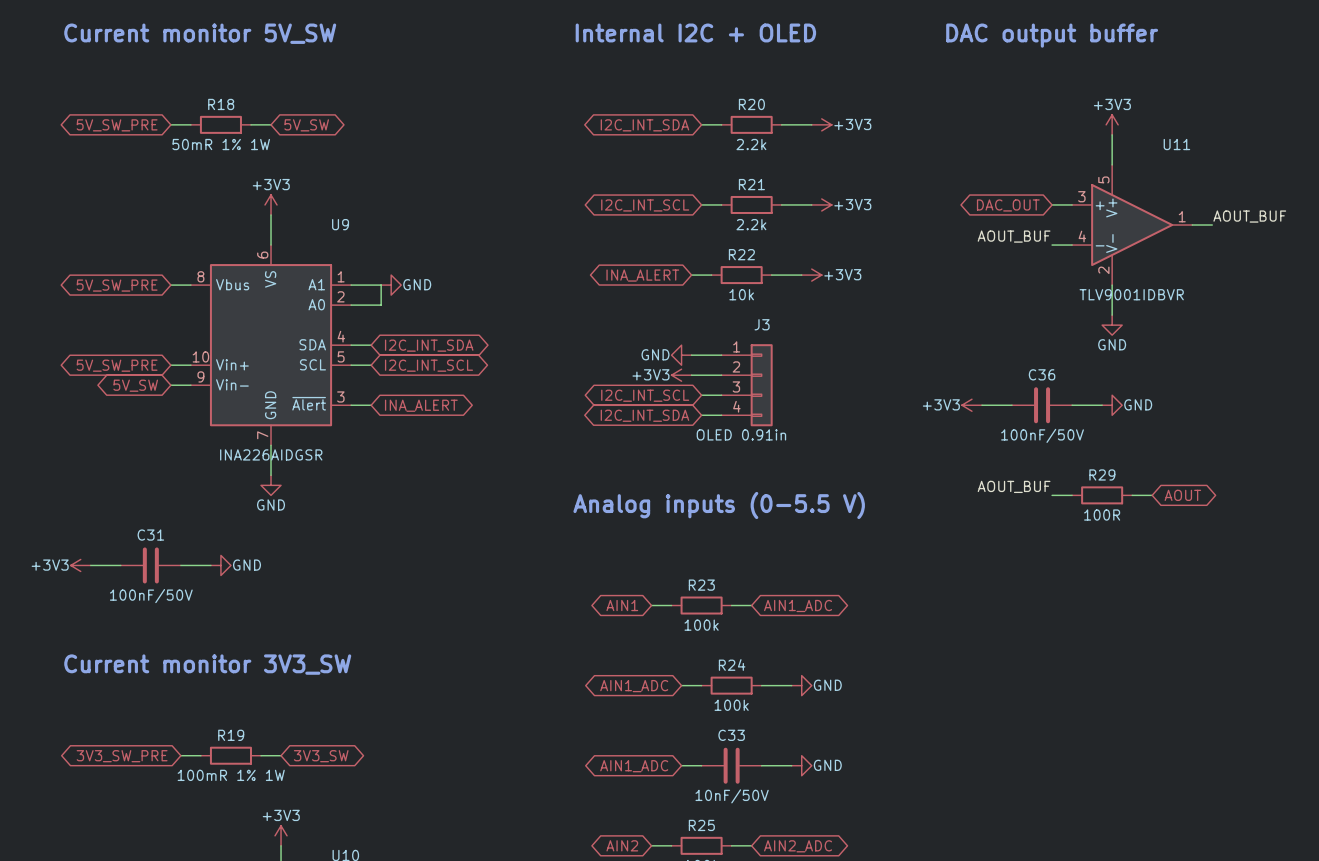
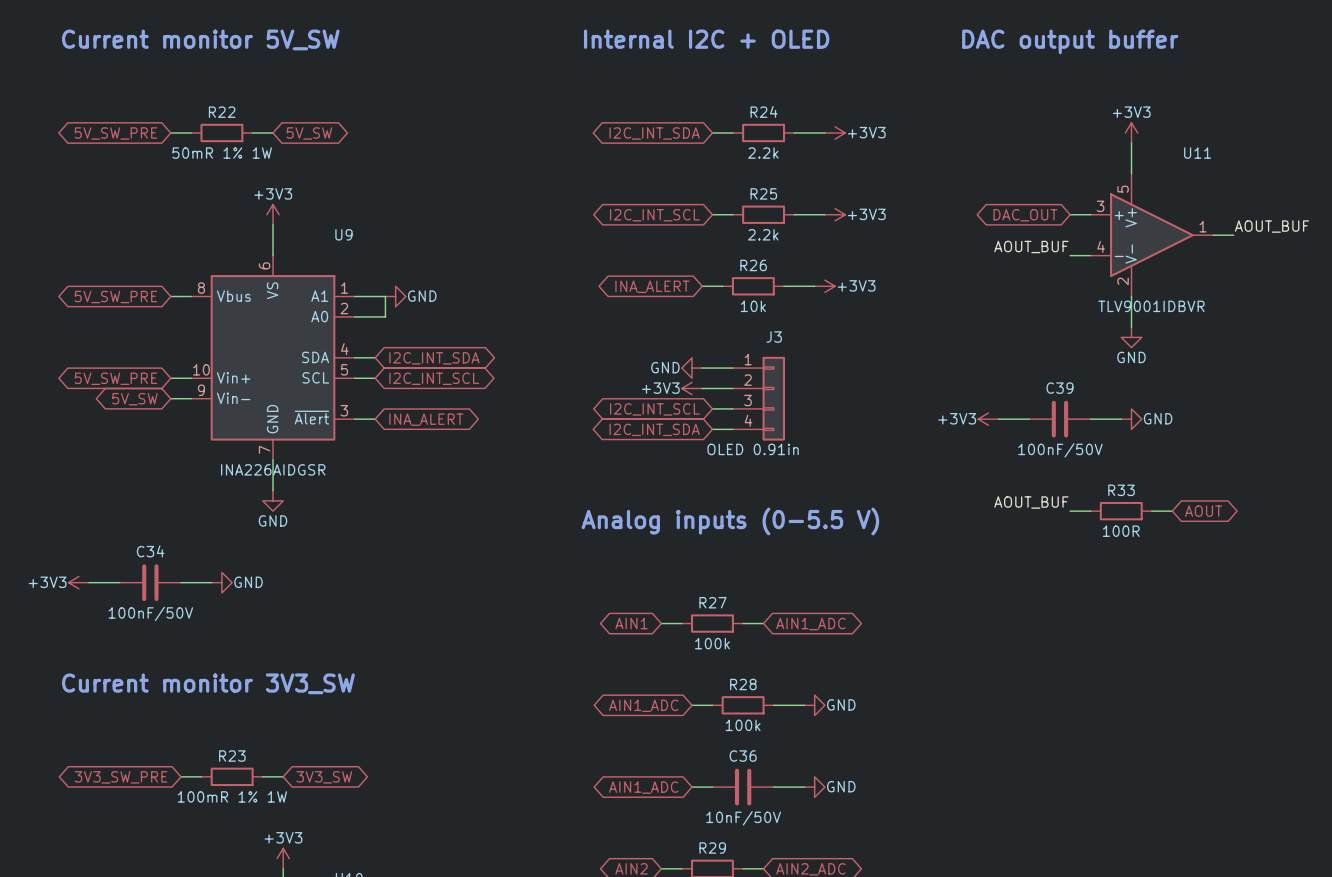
R18 name: R18 (221, 104) -> R22 (222, 112)
R20 name: R20 (751, 104) -> R24 (764, 111)
R21 name: R21 (751, 184) -> R25 (763, 193)
R22 name: R22 (741, 254) -> R26 (753, 265)
C36 name: C36 (1042, 374) -> C39 (1059, 388)
R29 name: R29 (1102, 474) -> R33 (1121, 490)
C31 name: C31 (150, 535) -> C34 (150, 551)
R23 name: R23 (701, 585) -> R27 (712, 602)
R24 name: R24 (732, 664) -> R28 (743, 684)
R19 name: R19 (231, 735) -> R23 (232, 756)
C33 name: C33 (731, 735) -> C36 (743, 756)
R25 name: R25 (701, 825) -> R29 (712, 848)

